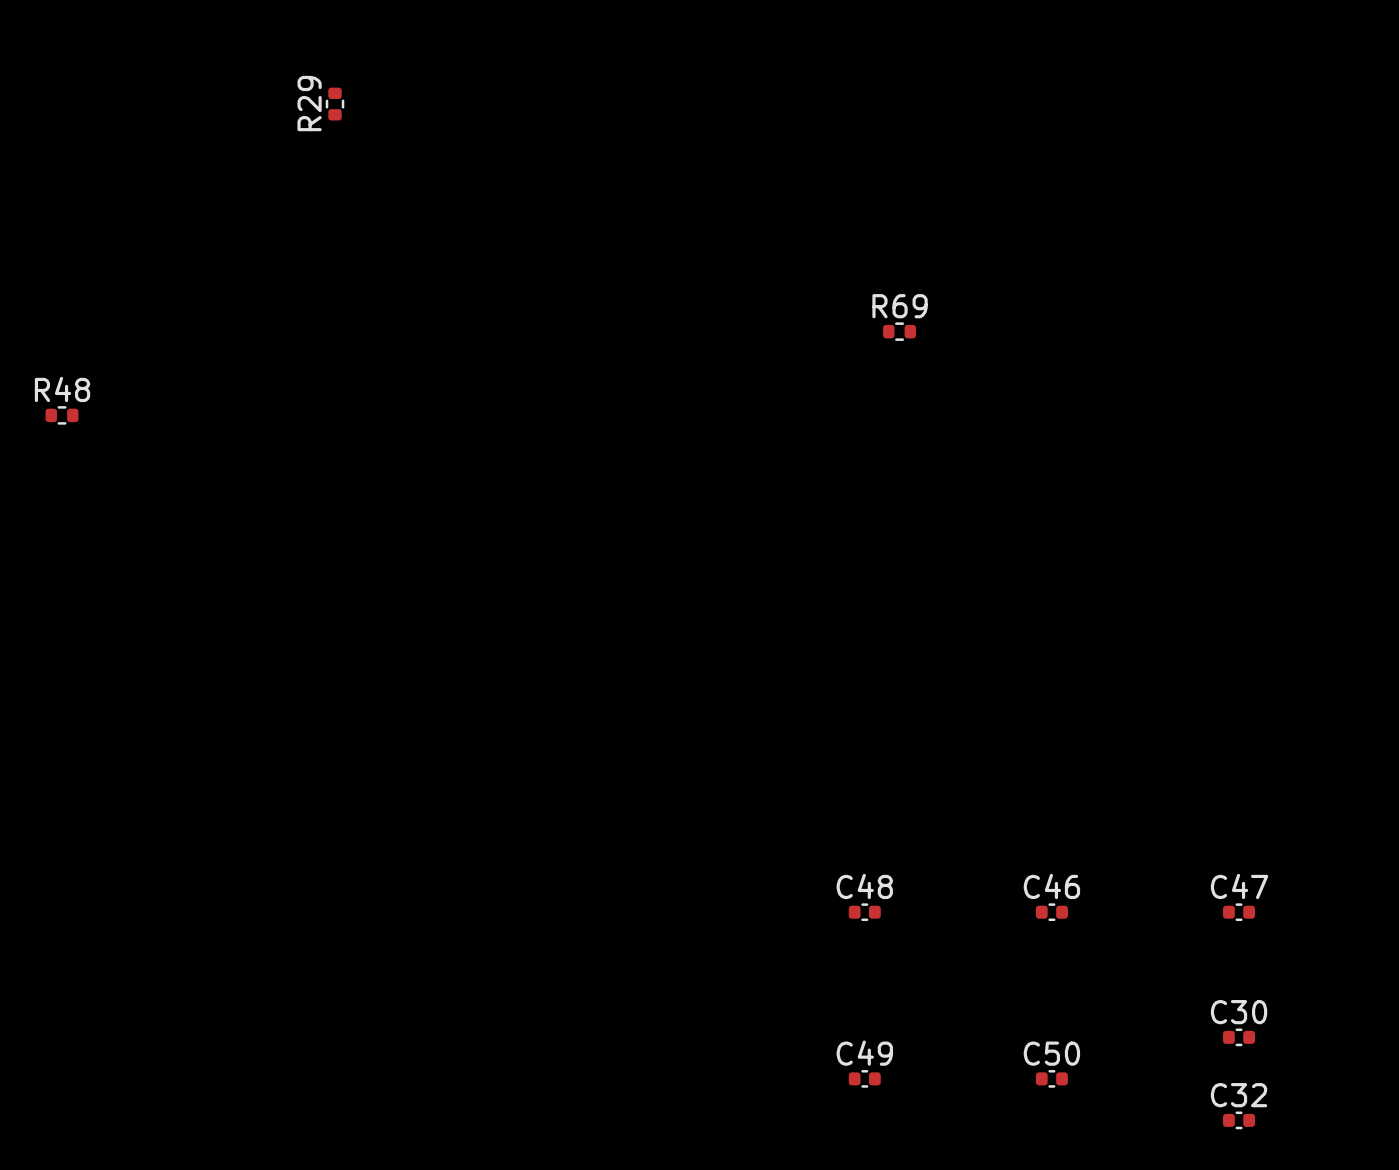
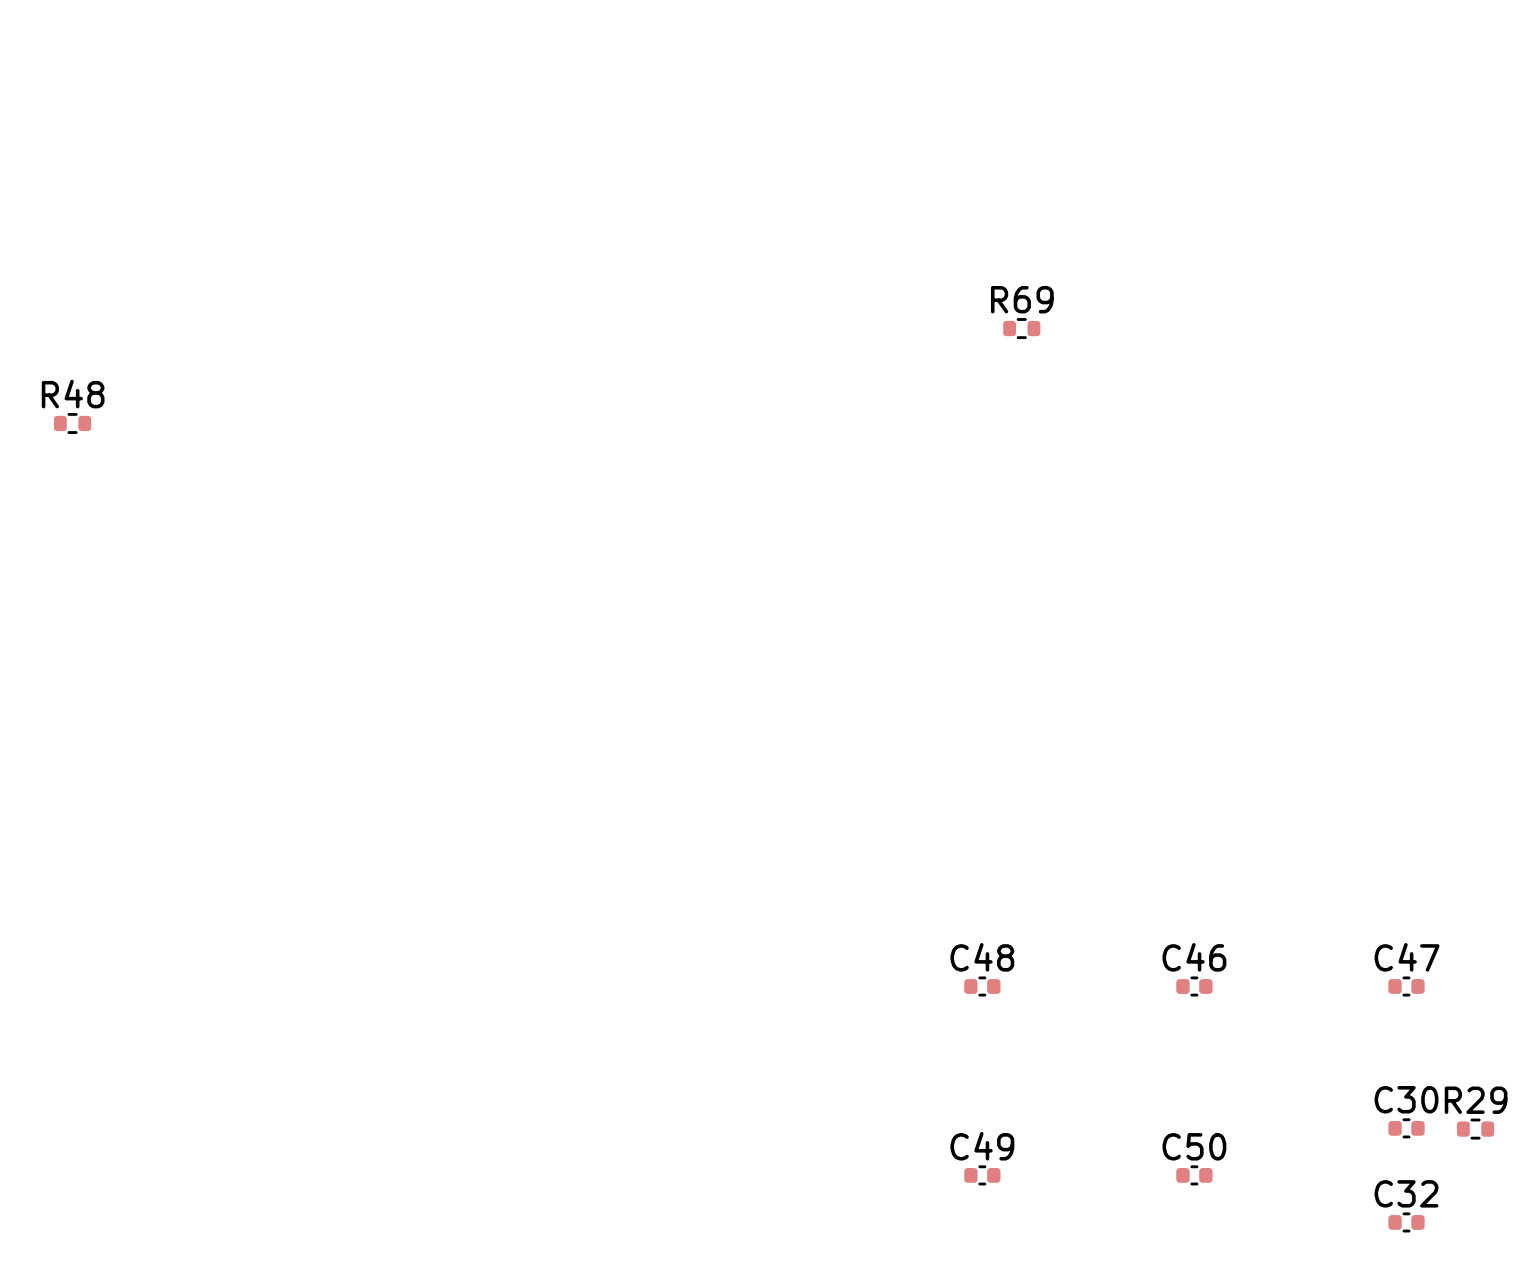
R29 rotation: 0° (335, 104) -> 90° clockwise (1475, 1129)
R29 position: (335, 104) -> (1475, 1129)

